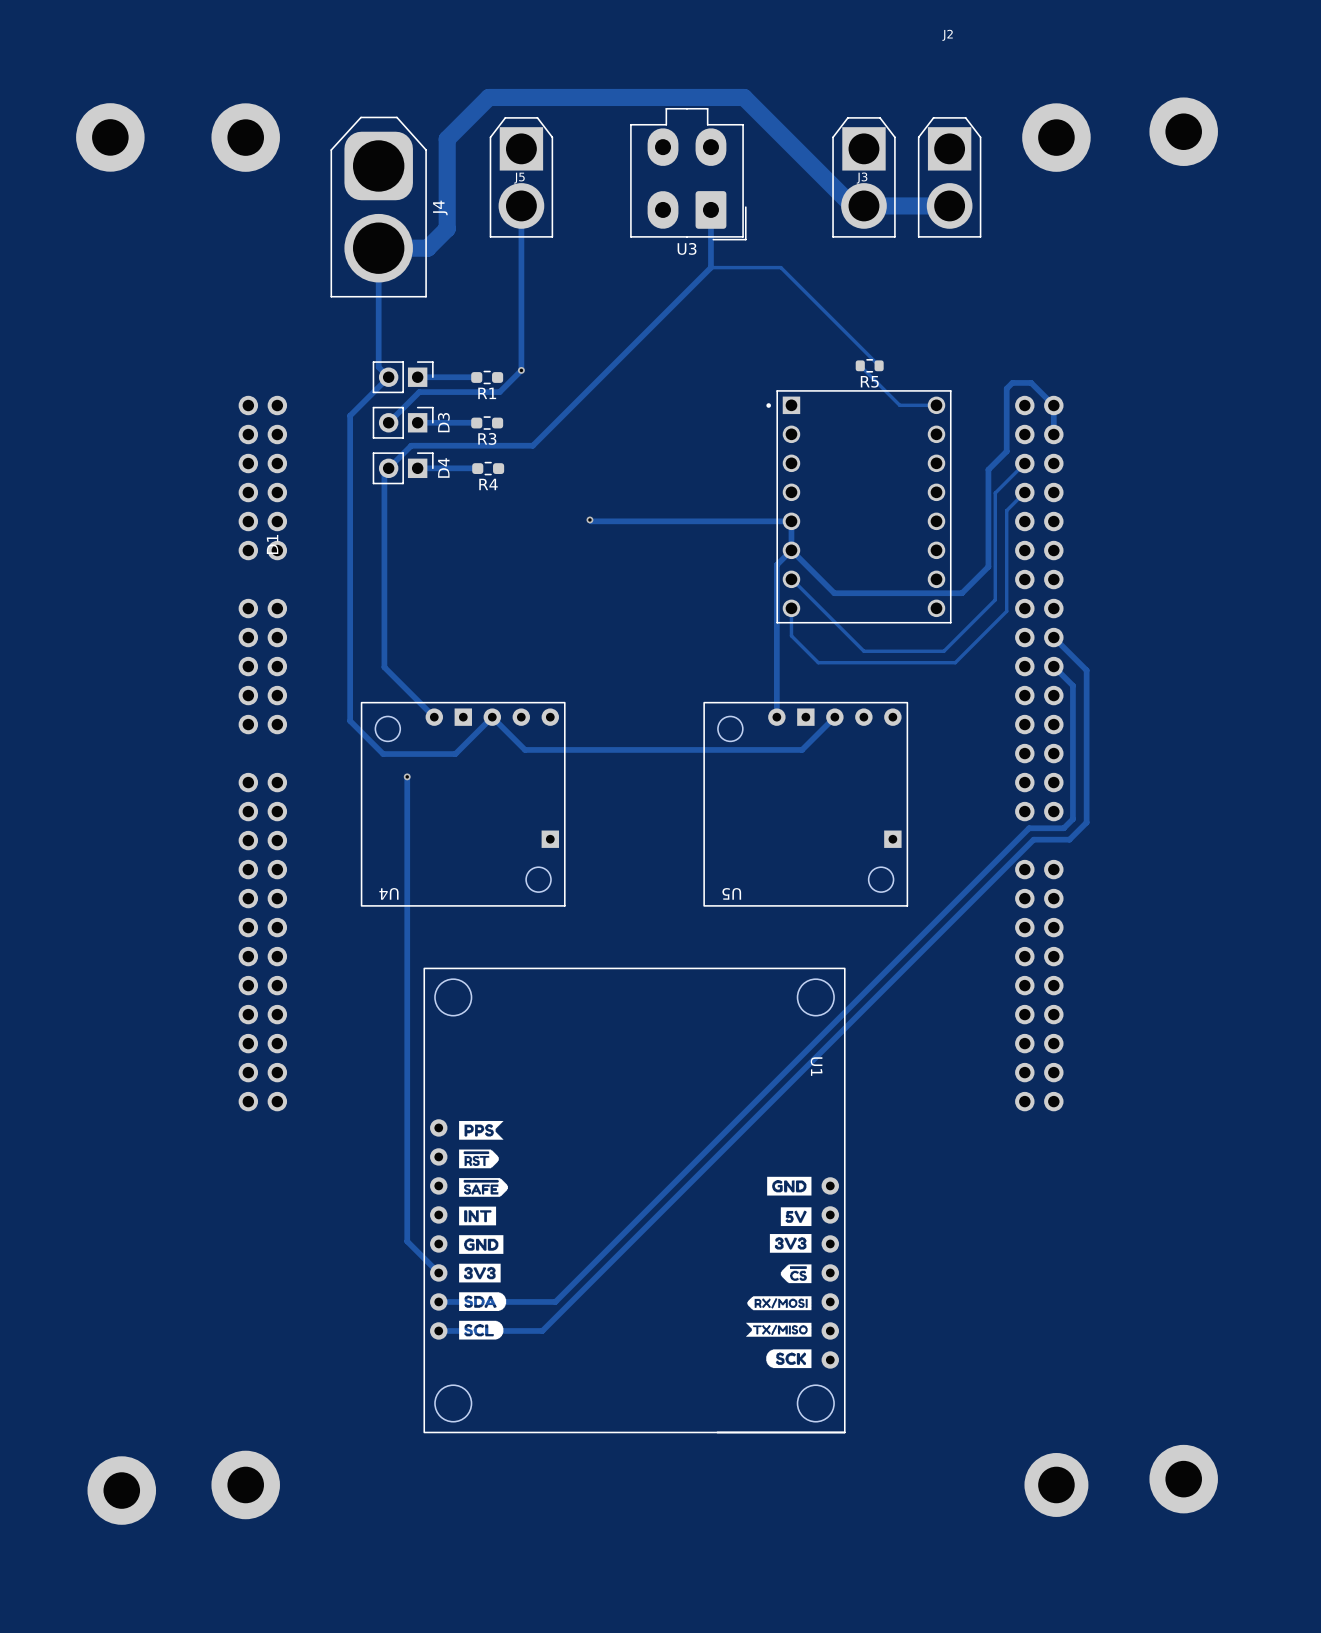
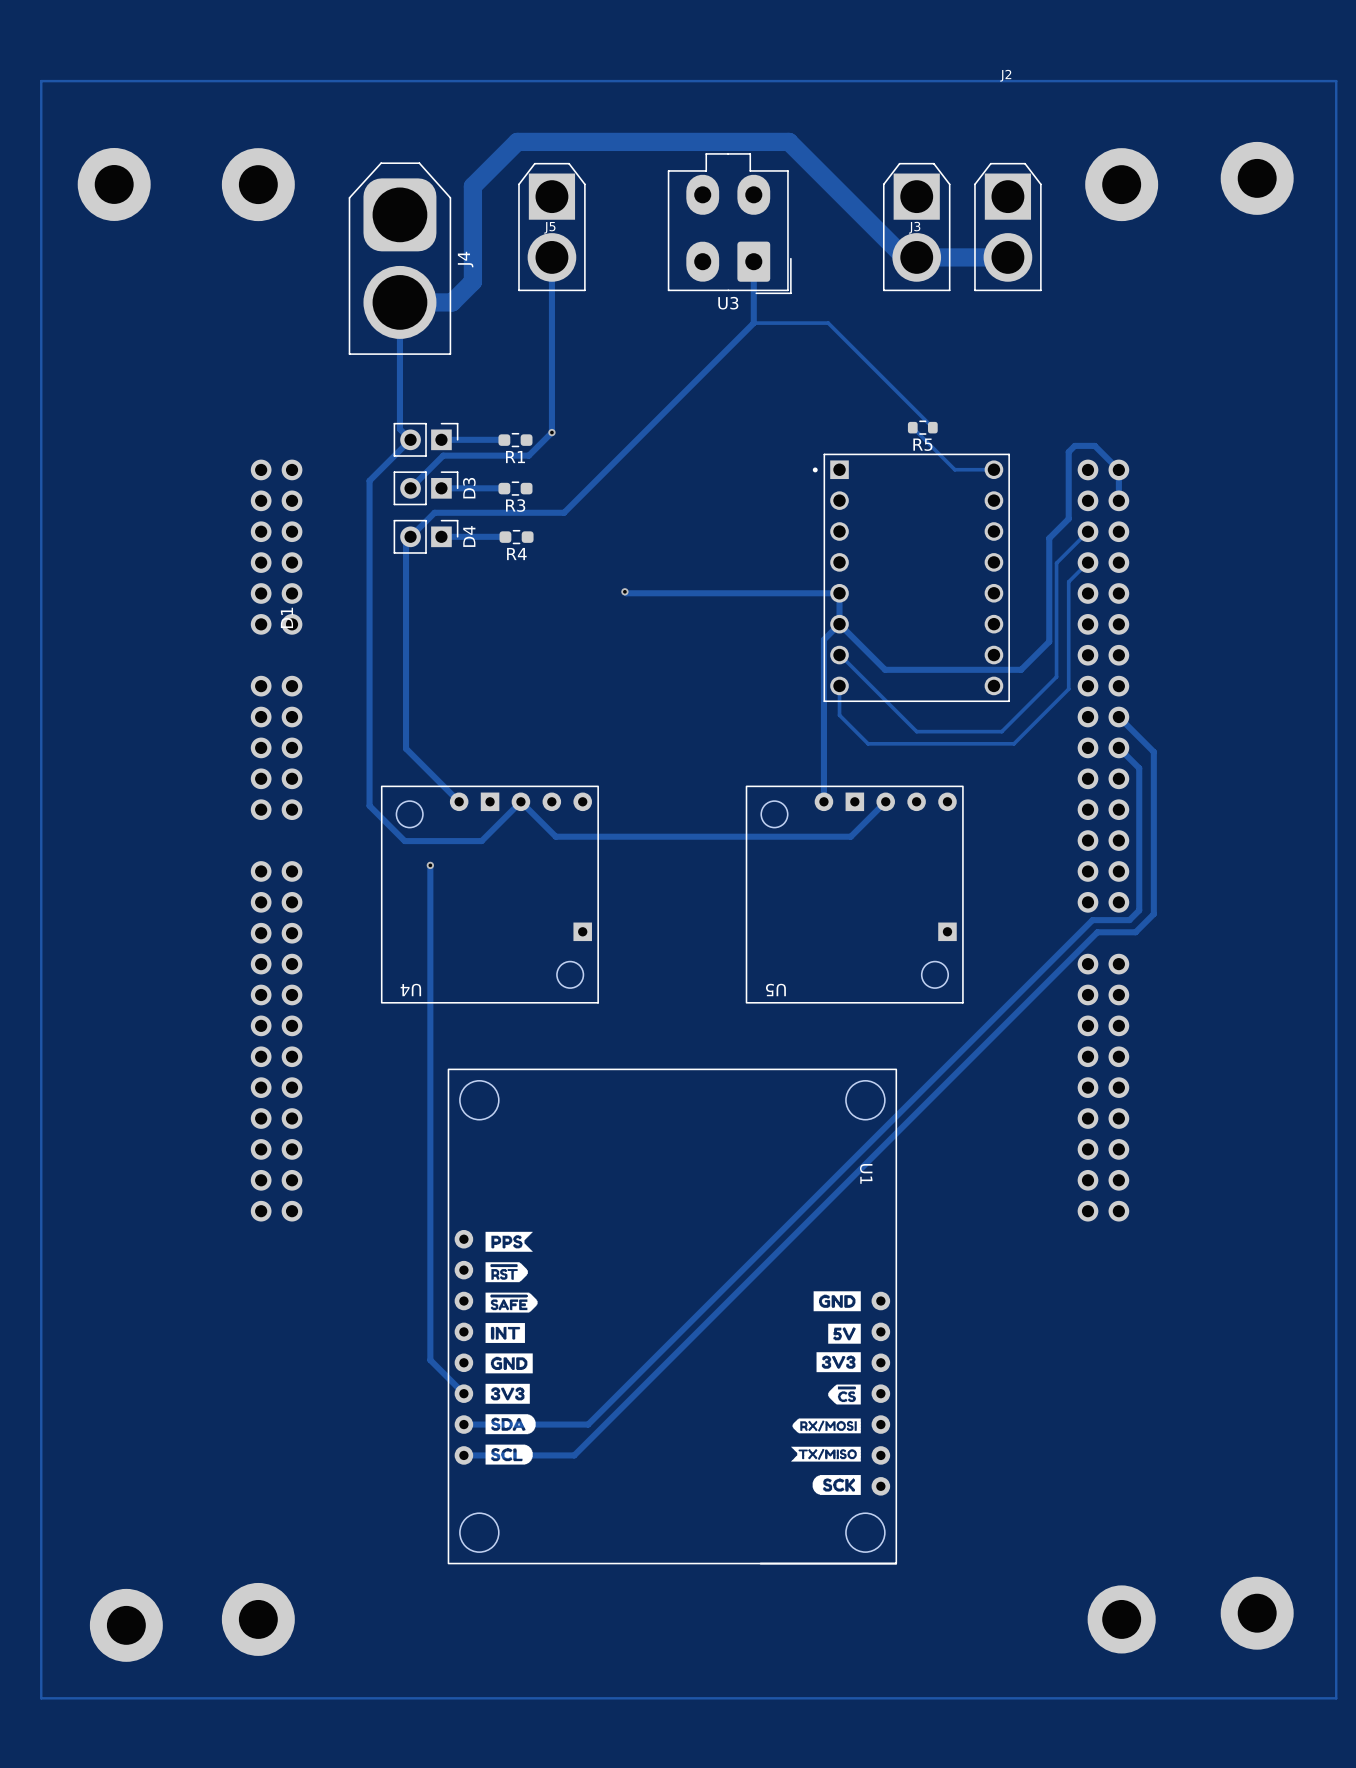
track: none -> (41, 81) (1336, 81) (1336, 1698) (41, 1698) (41, 81)

